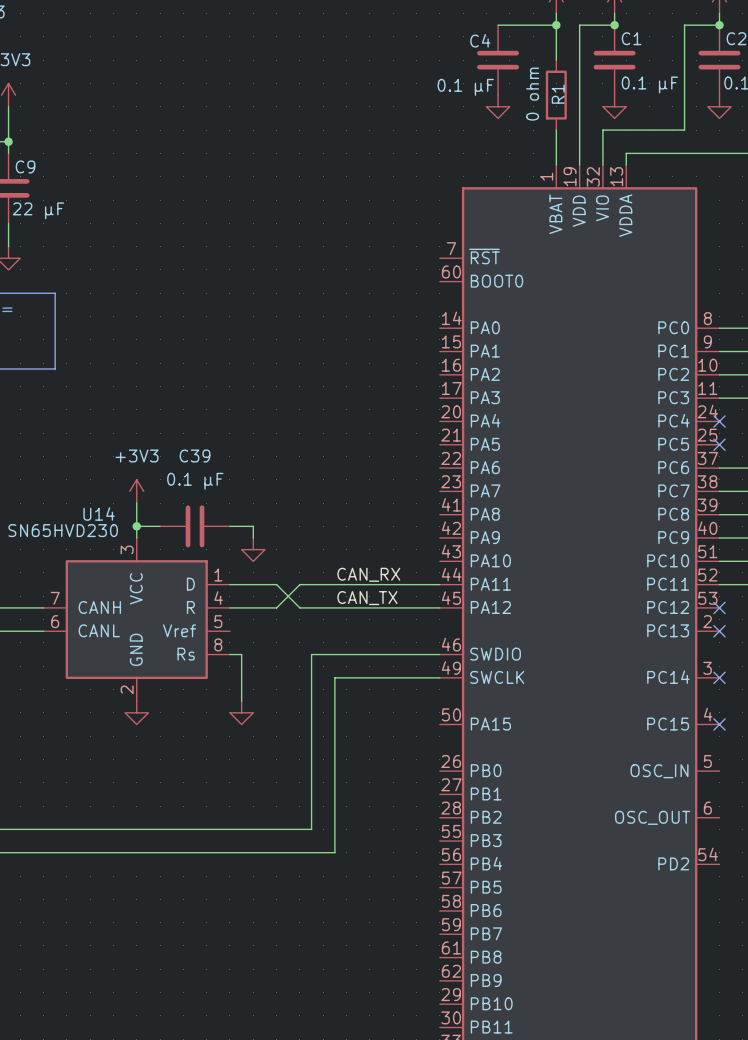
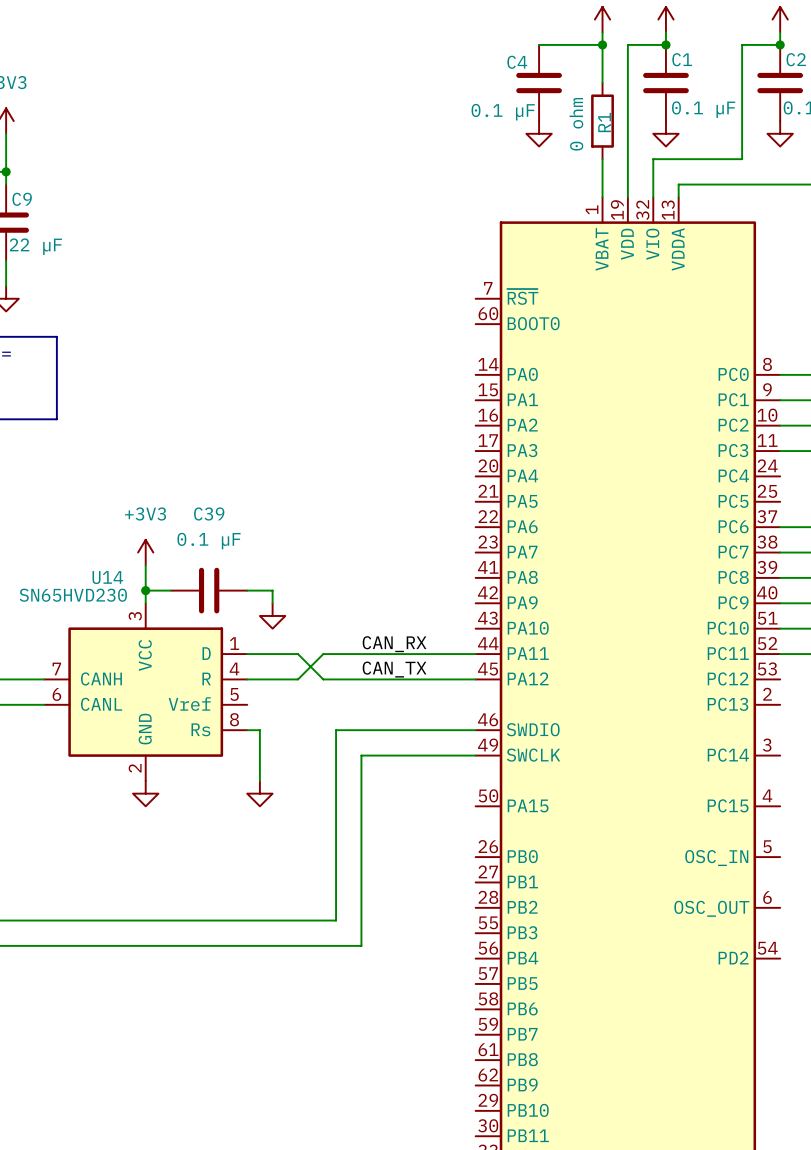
no-connect mark: (719, 421) -> none
no-connect mark: (719, 444) -> none
no-connect mark: (719, 607) -> none
no-connect mark: (719, 631) -> none
no-connect mark: (719, 677) -> none
no-connect mark: (719, 724) -> none

